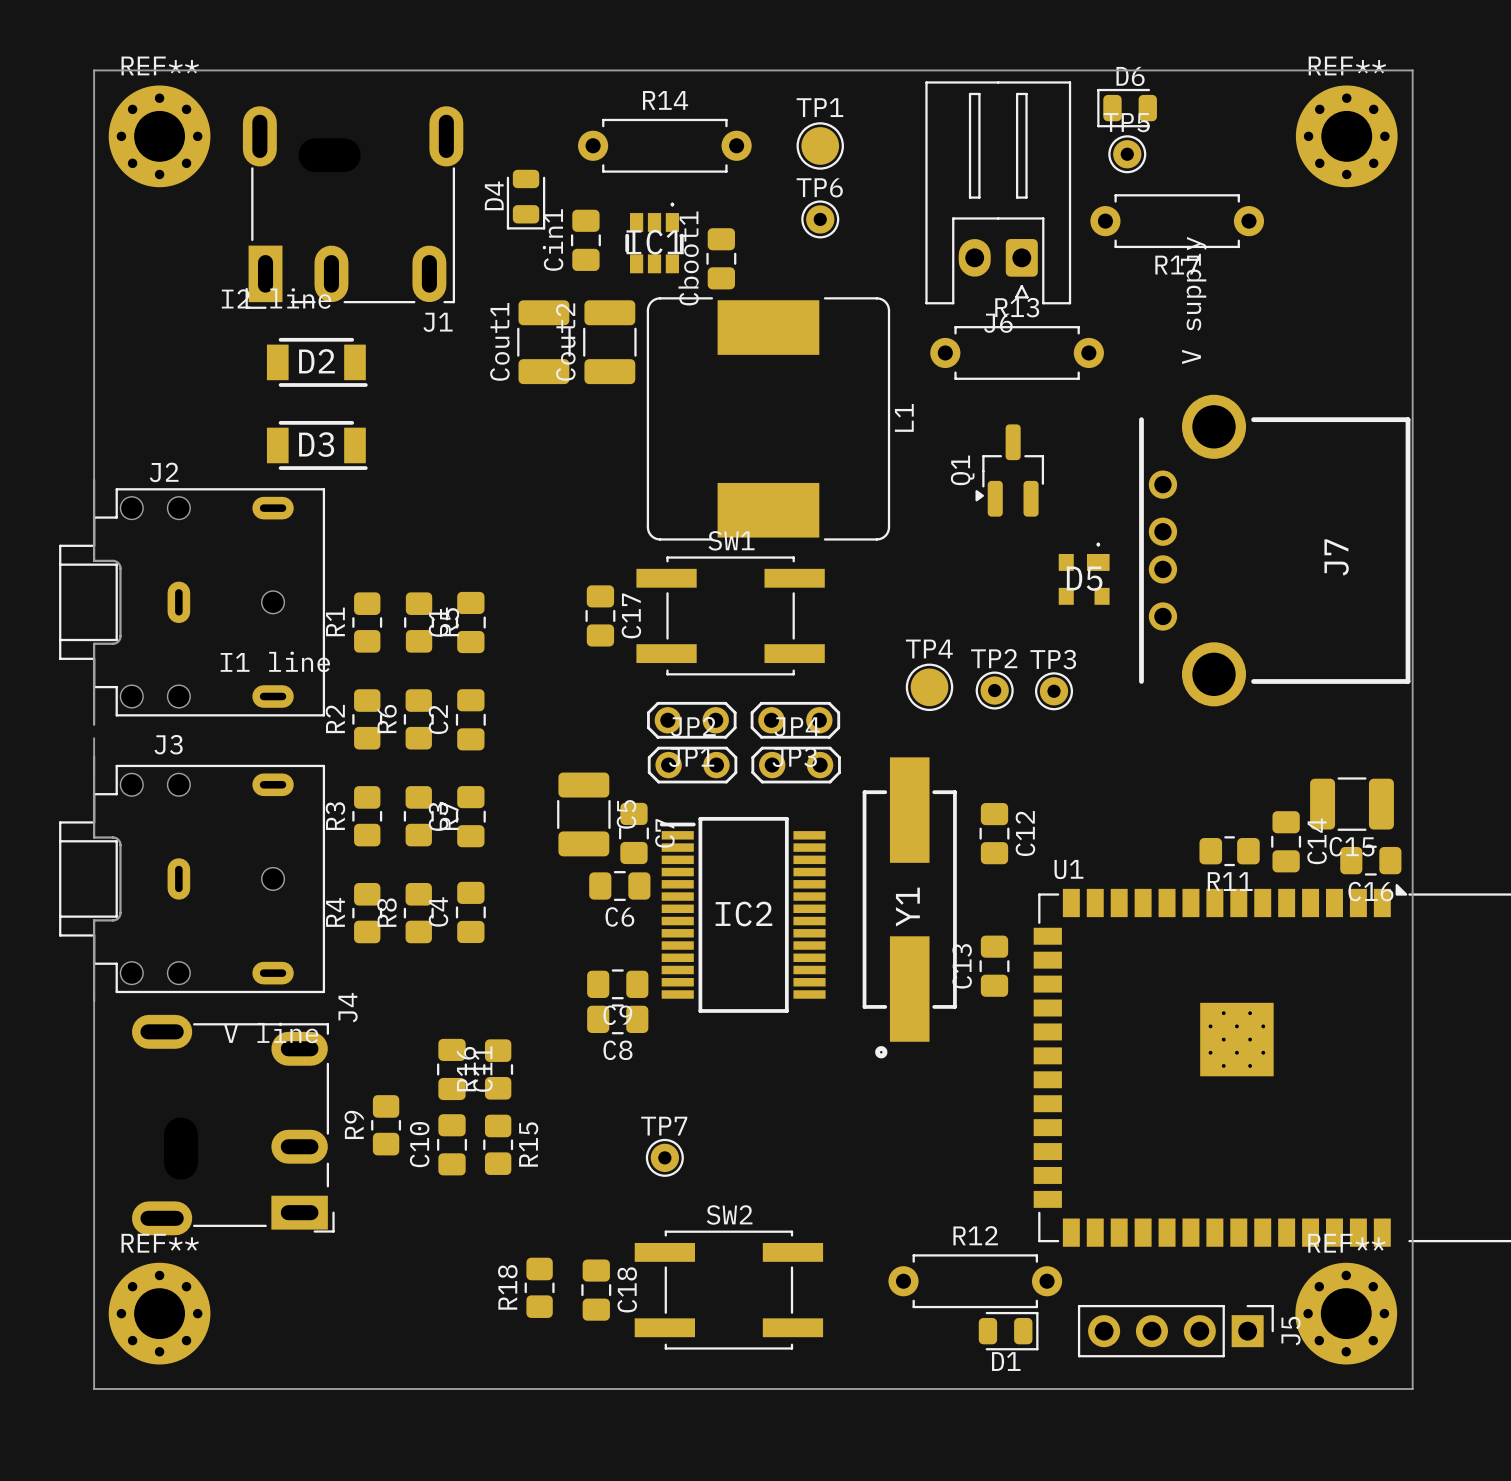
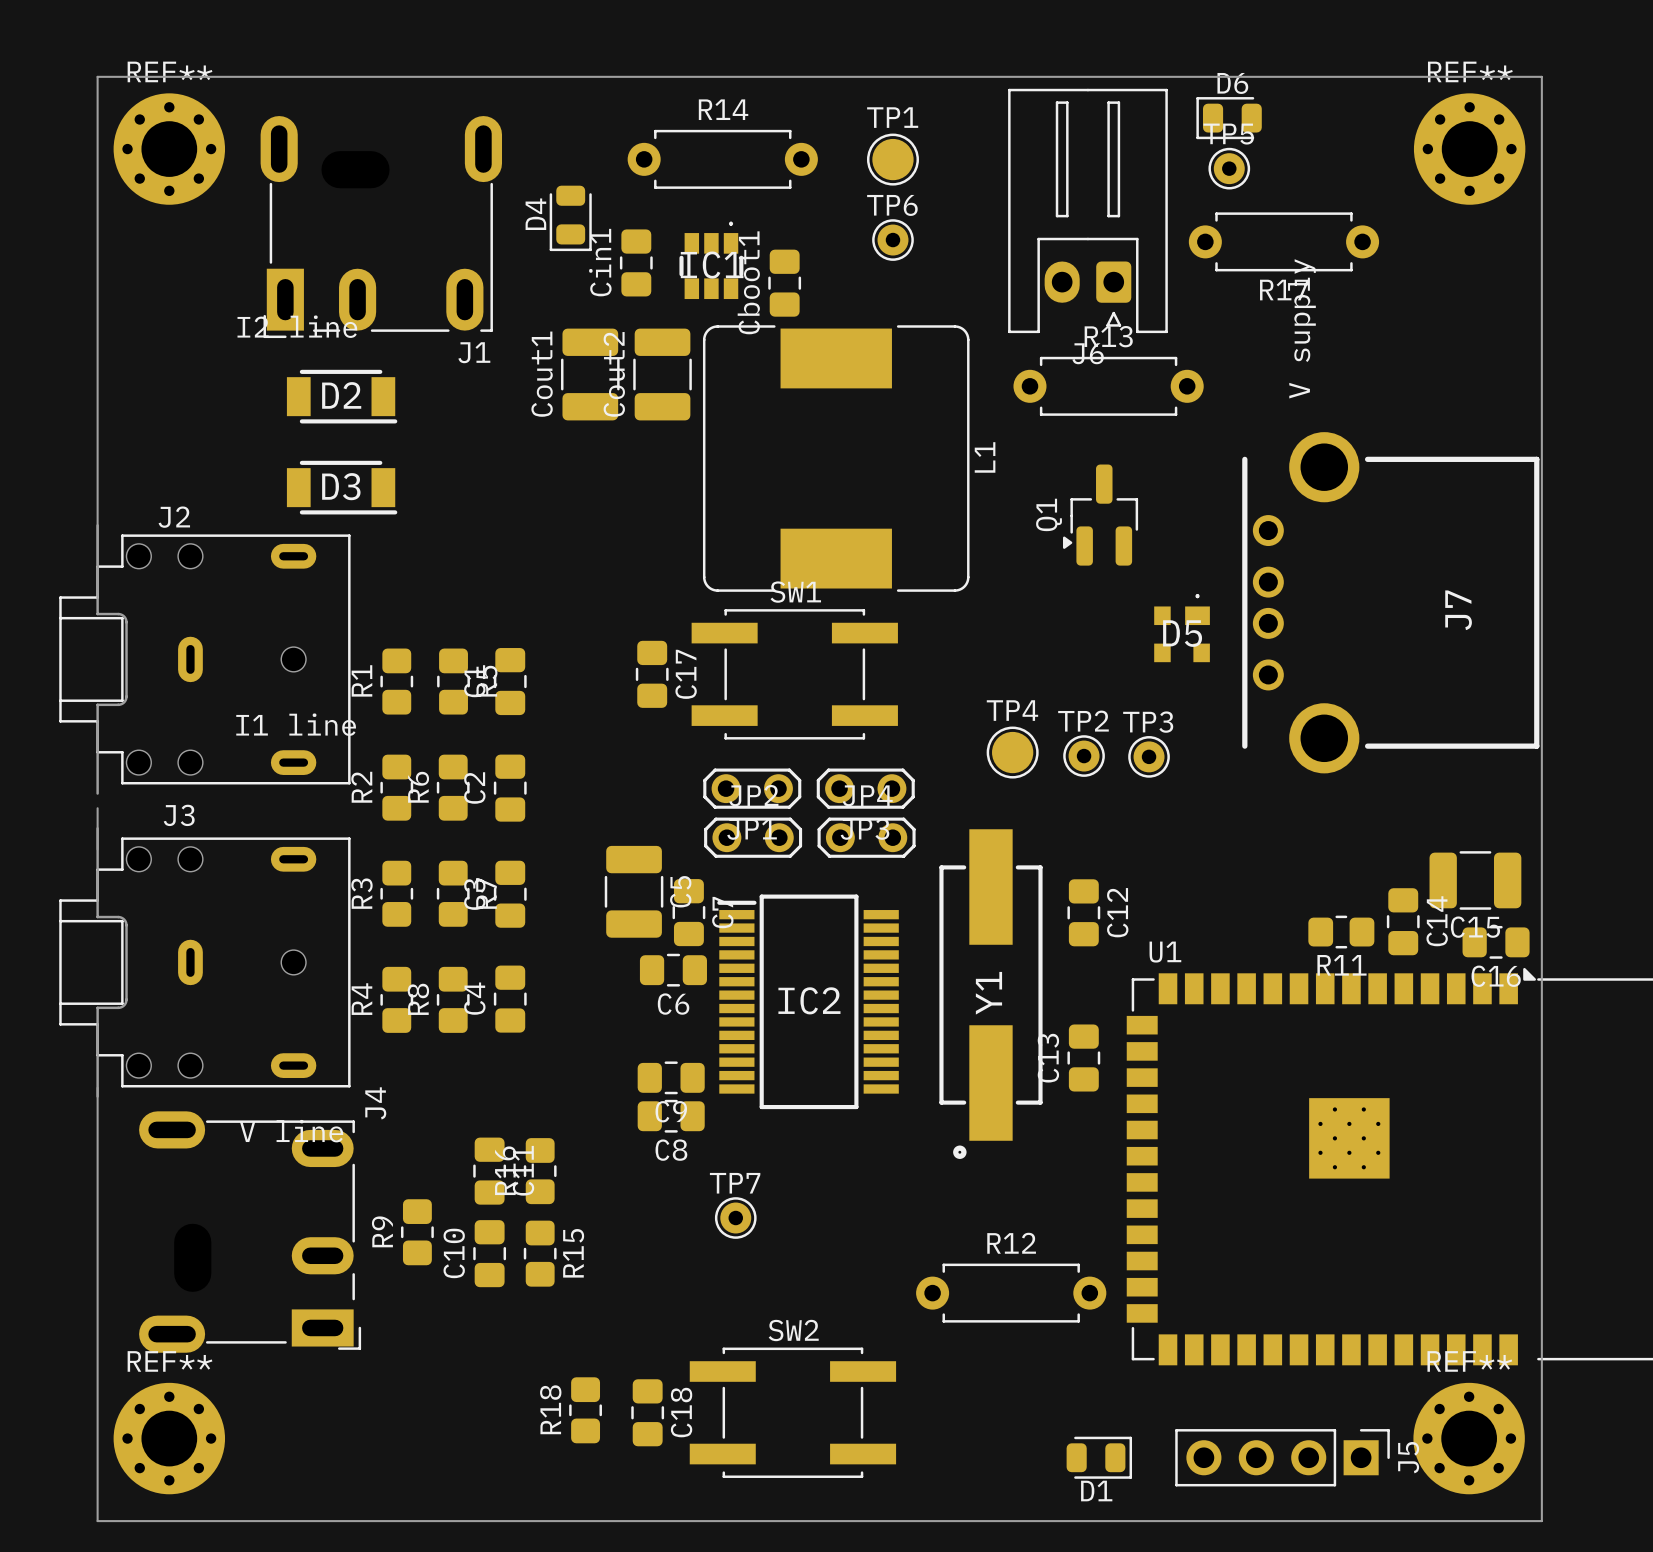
TP7 position: (664, 1157) -> (735, 1218)
R12 position: (975, 1281) -> (1011, 1293)

